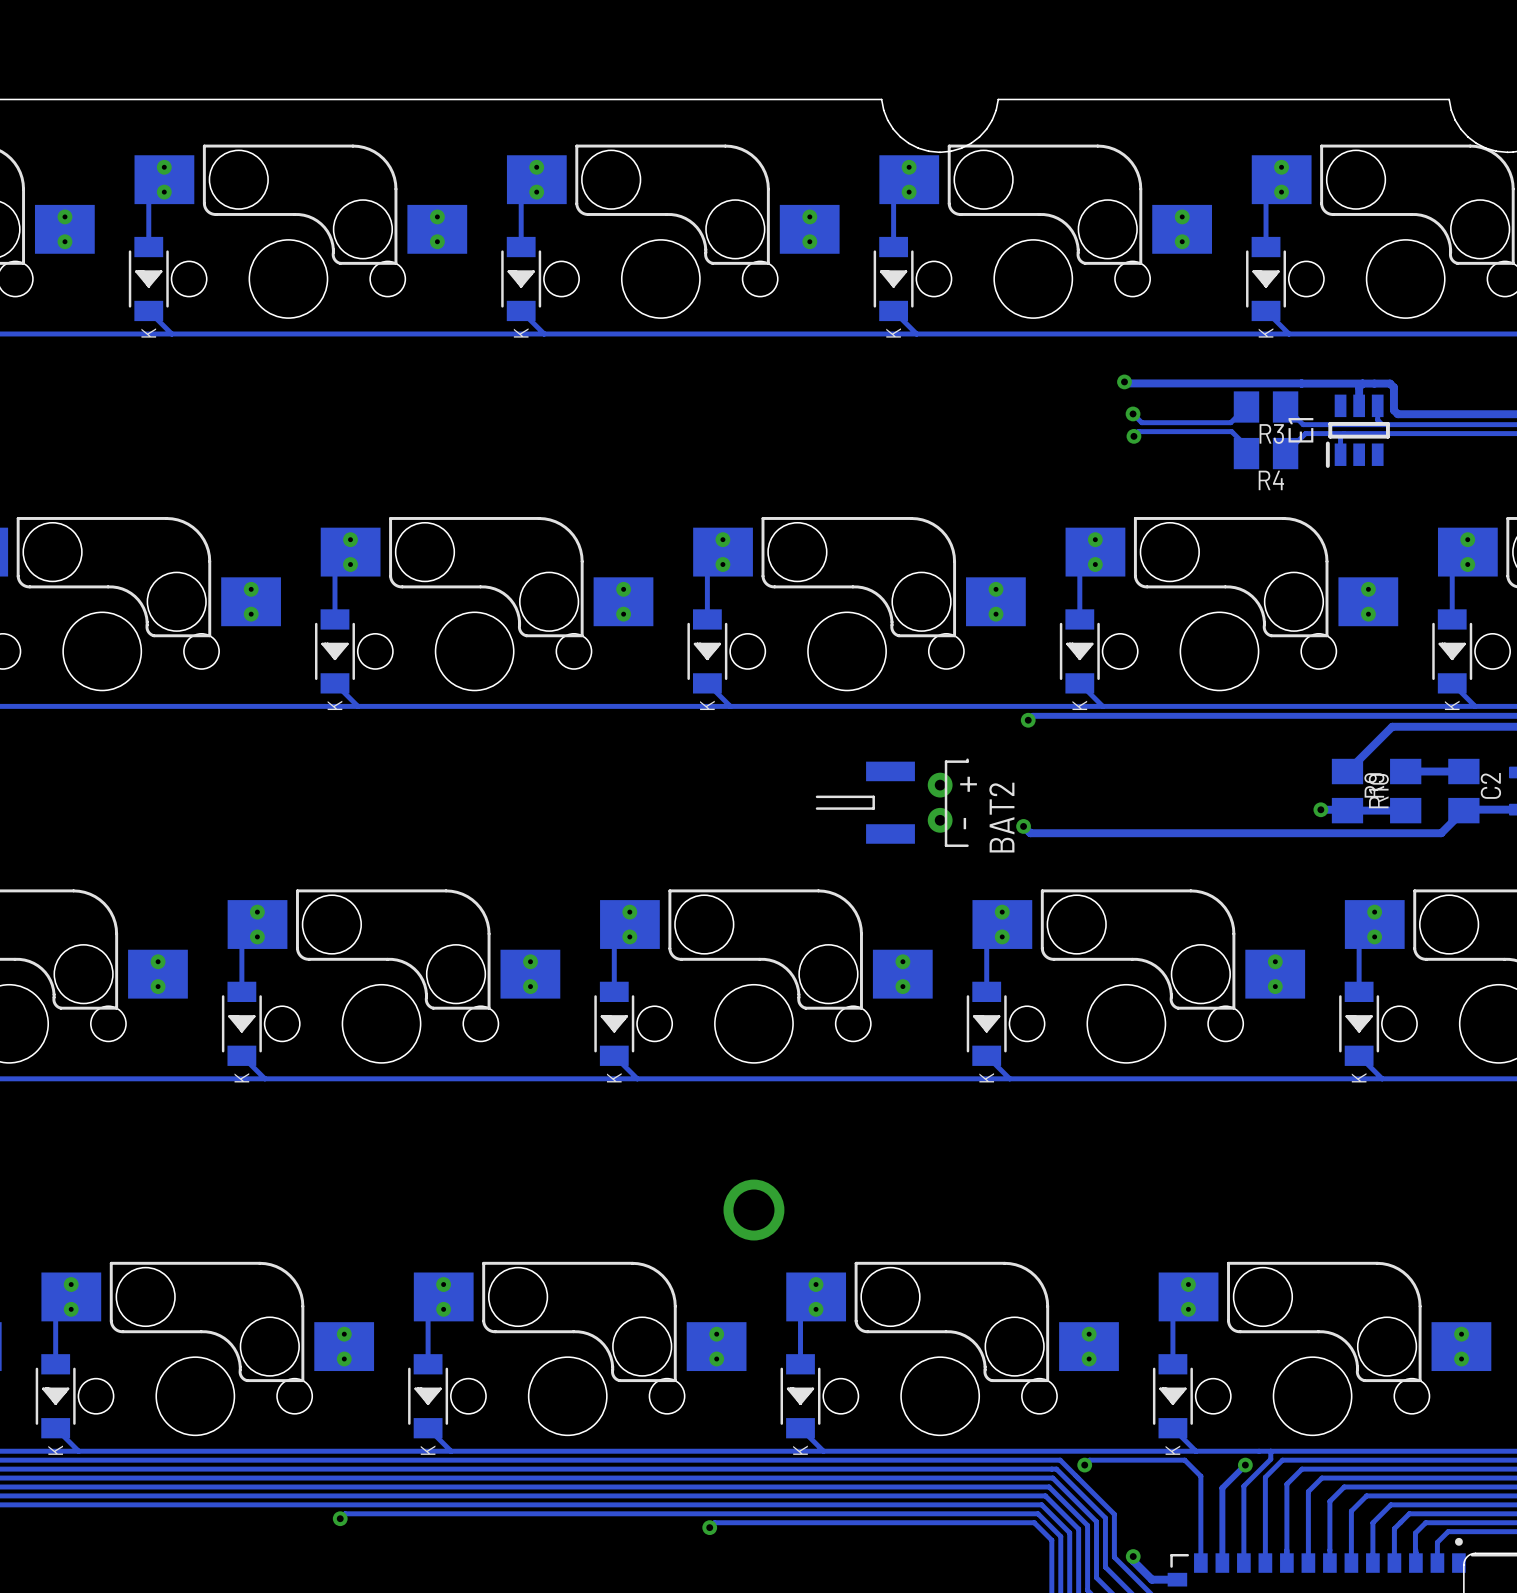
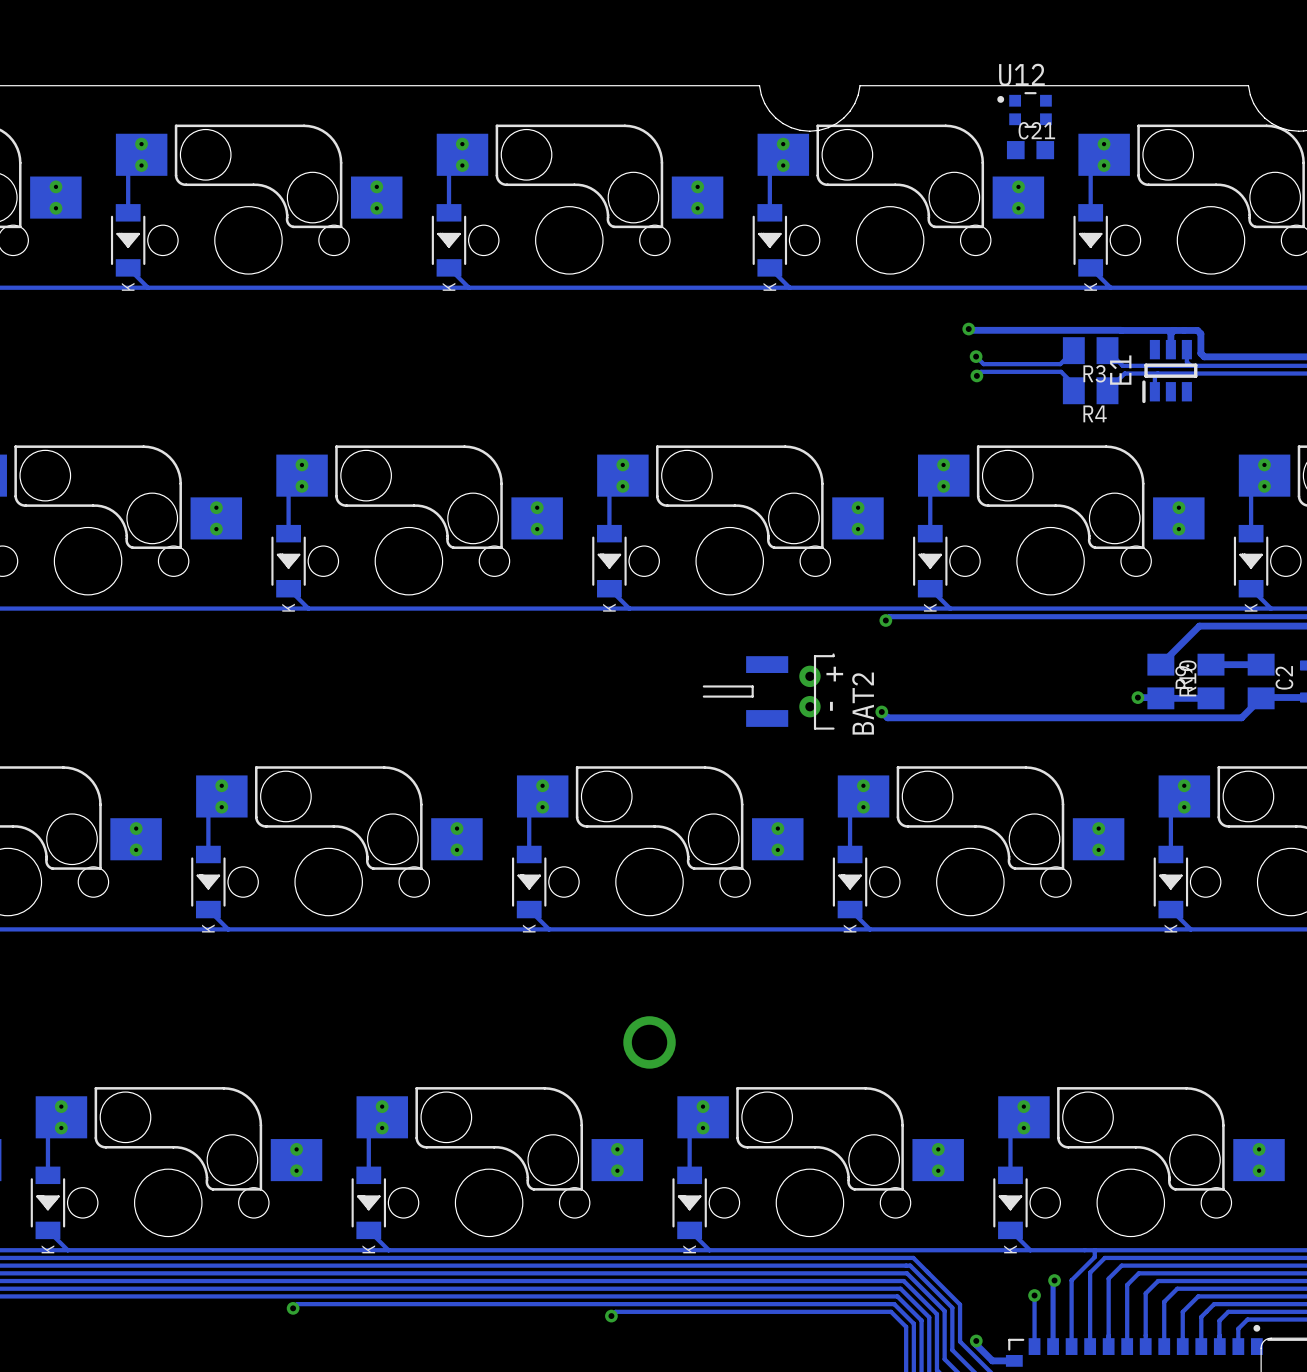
U12: none -> (1024, 110)
C21: none -> (1030, 150)
track: (1084, 1465) (1089, 1460) (1184, 1460) (1200, 1476) (1200, 1503) -> none
via: (1084, 1465) -> none
track: (1245, 1465) (1224, 1486) -> none
via: (1245, 1465) -> none
via: none -> (1054, 1280)
via: none -> (1034, 1295)

